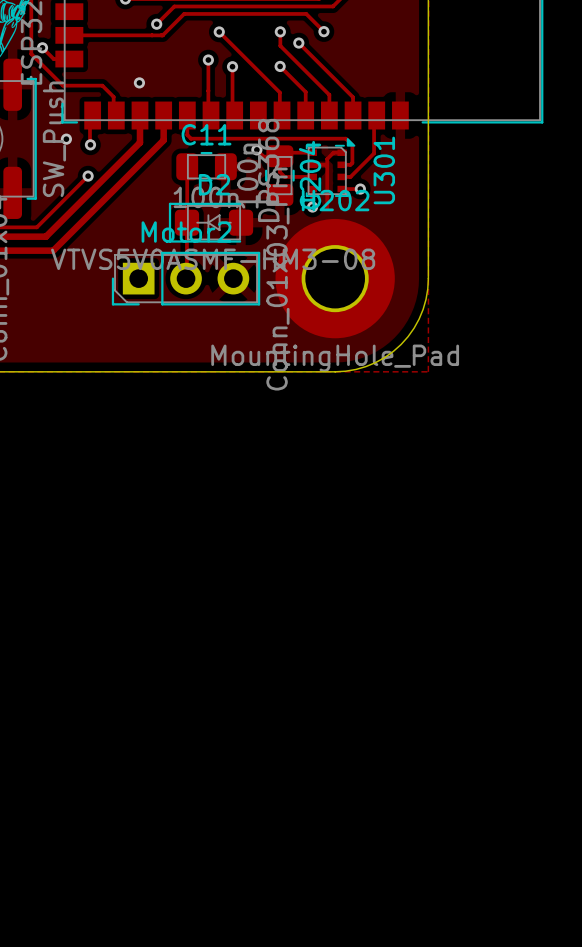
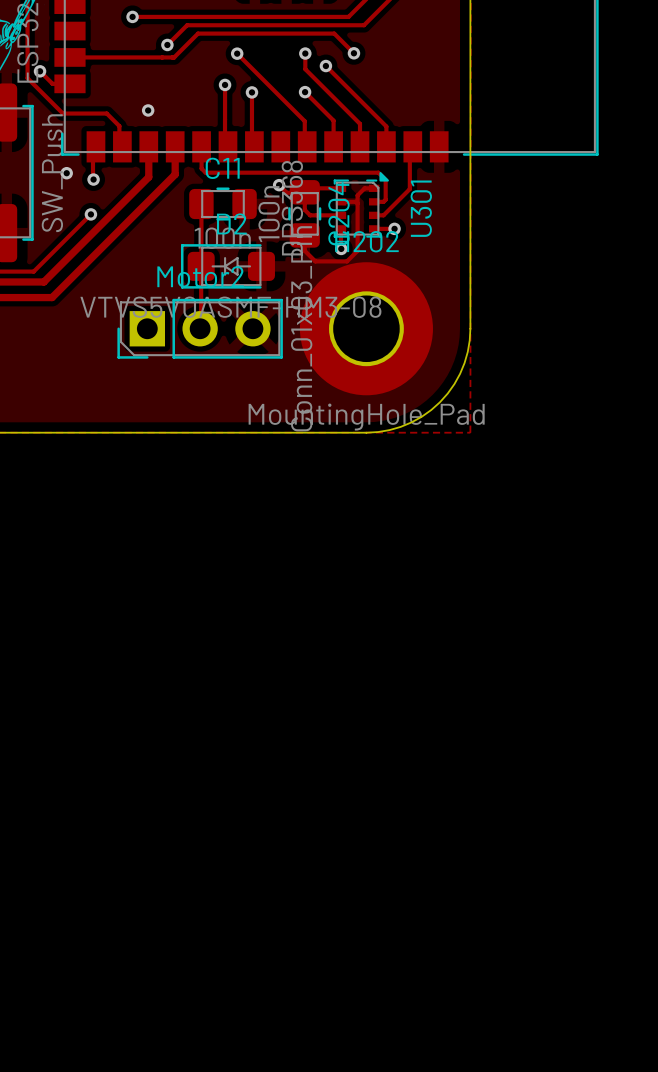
track: none -> (304, 235) (304, 250) (315, 261) (347, 261) (357, 250)

